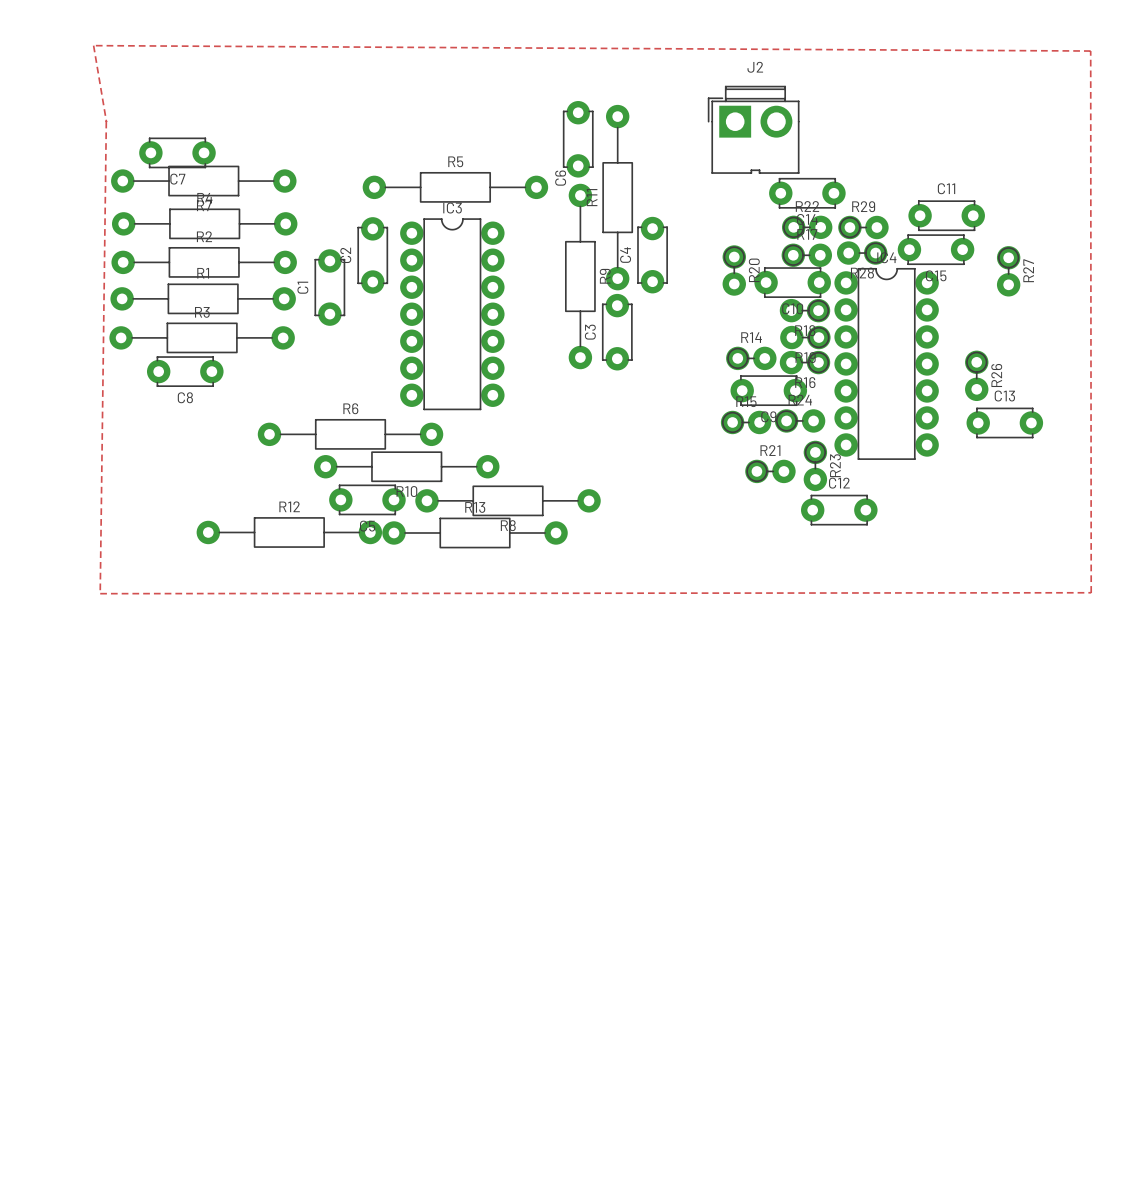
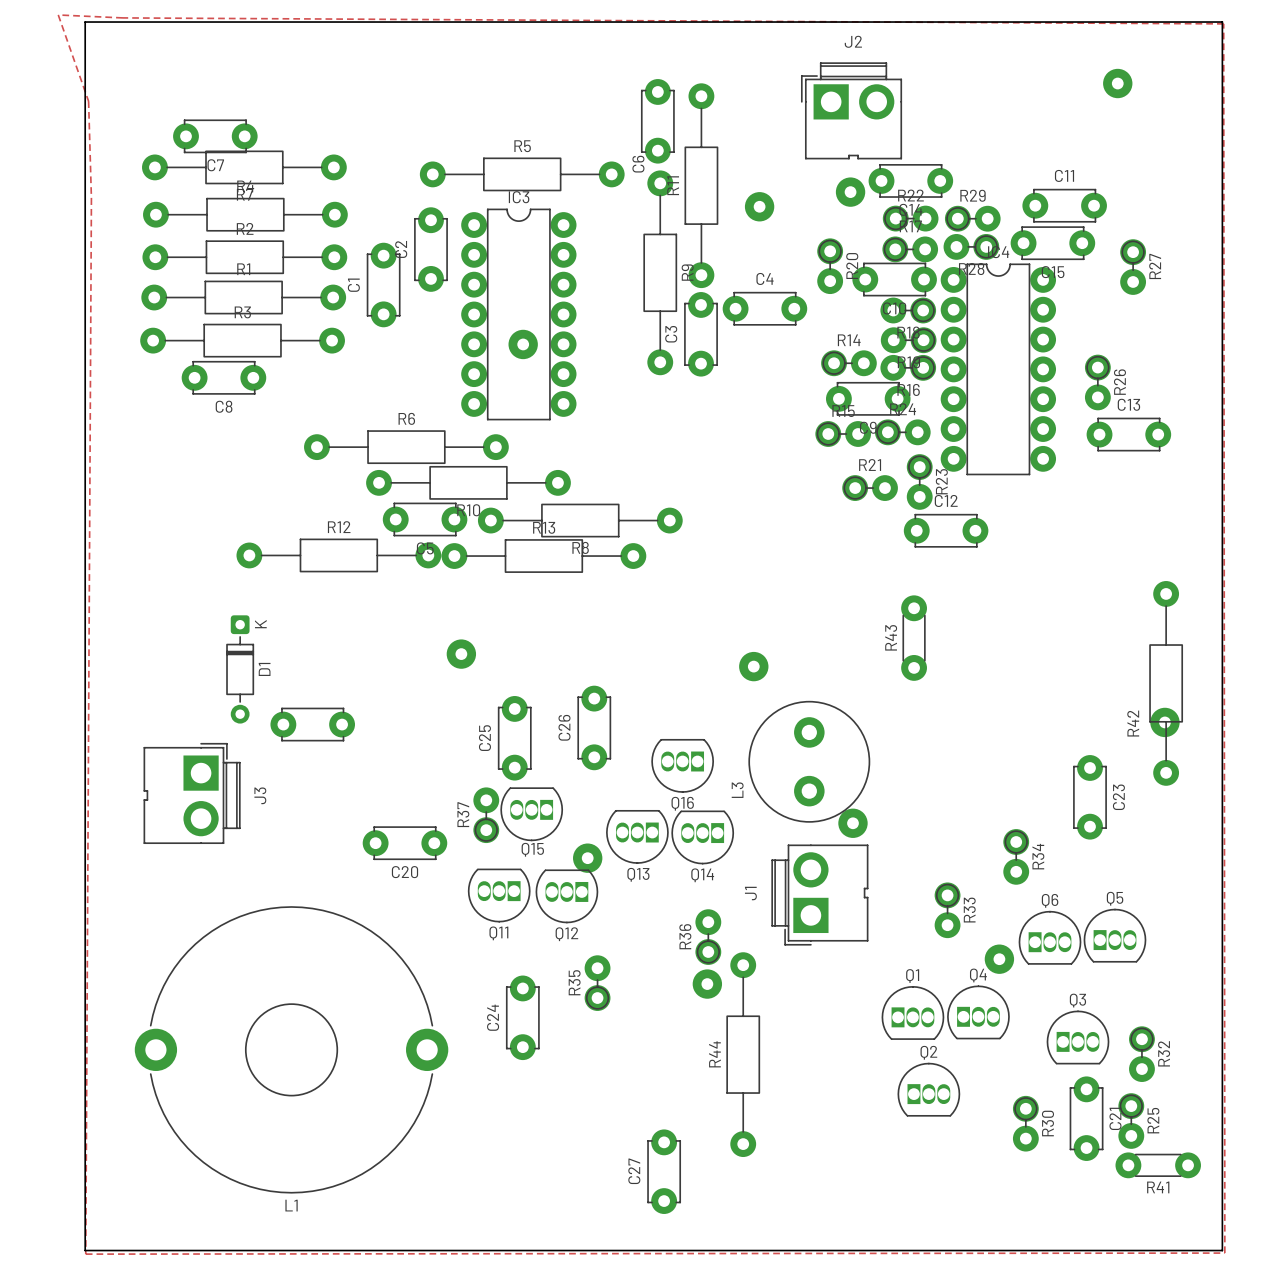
zone outline: (93, 45) (106, 121) (100, 593) (1091, 592) -> (122, 17) (58, 14) (88, 101) (91, 198) (85, 1254) (1224, 1253) (1224, 622)
board edge: none -> (85, 22) (1222, 22) (1222, 1250) (85, 1250) (85, 22)
via: none -> (1117, 83)
via: none -> (850, 192)
via: none -> (759, 206)
C4 rotation: 0° (652, 255) -> 90° clockwise (764, 308)
C4 position: (652, 255) -> (764, 308)
via: none -> (523, 344)
R43: none -> (914, 638)
via: none -> (461, 654)
via: none -> (753, 666)
D1: none -> (240, 669)
R42: none -> (1166, 683)
via: none -> (1164, 722)
part: none -> (312, 724)
C26: none -> (594, 727)
C25: none -> (514, 738)
L3: none -> (809, 761)
Q16: none -> (682, 765)
J3: none -> (192, 793)
C23: none -> (1090, 797)
Q15: none -> (531, 814)
R37: none -> (486, 815)
via: none -> (852, 823)
Q13: none -> (637, 836)
Q14: none -> (702, 837)
C20: none -> (404, 843)
R34: none -> (1016, 856)
via: none -> (587, 858)
Q11: none -> (499, 895)
J1: none -> (819, 895)
Q12: none -> (566, 896)
R33: none -> (947, 910)
Q5: none -> (1114, 935)
R36: none -> (708, 937)
Q6: none -> (1049, 937)
via: none -> (999, 959)
R35: none -> (597, 983)
via: none -> (707, 984)
Q1: none -> (912, 1012)
Q4: none -> (978, 1012)
C24: none -> (522, 1017)
Q3: none -> (1078, 1037)
L1: none -> (291, 1049)
R44: none -> (743, 1054)
R32: none -> (1141, 1054)
Q2: none -> (928, 1089)
C21: none -> (1086, 1118)
R25: none -> (1131, 1121)
R30: none -> (1025, 1123)
R41: none -> (1158, 1165)
C27: none -> (664, 1171)

